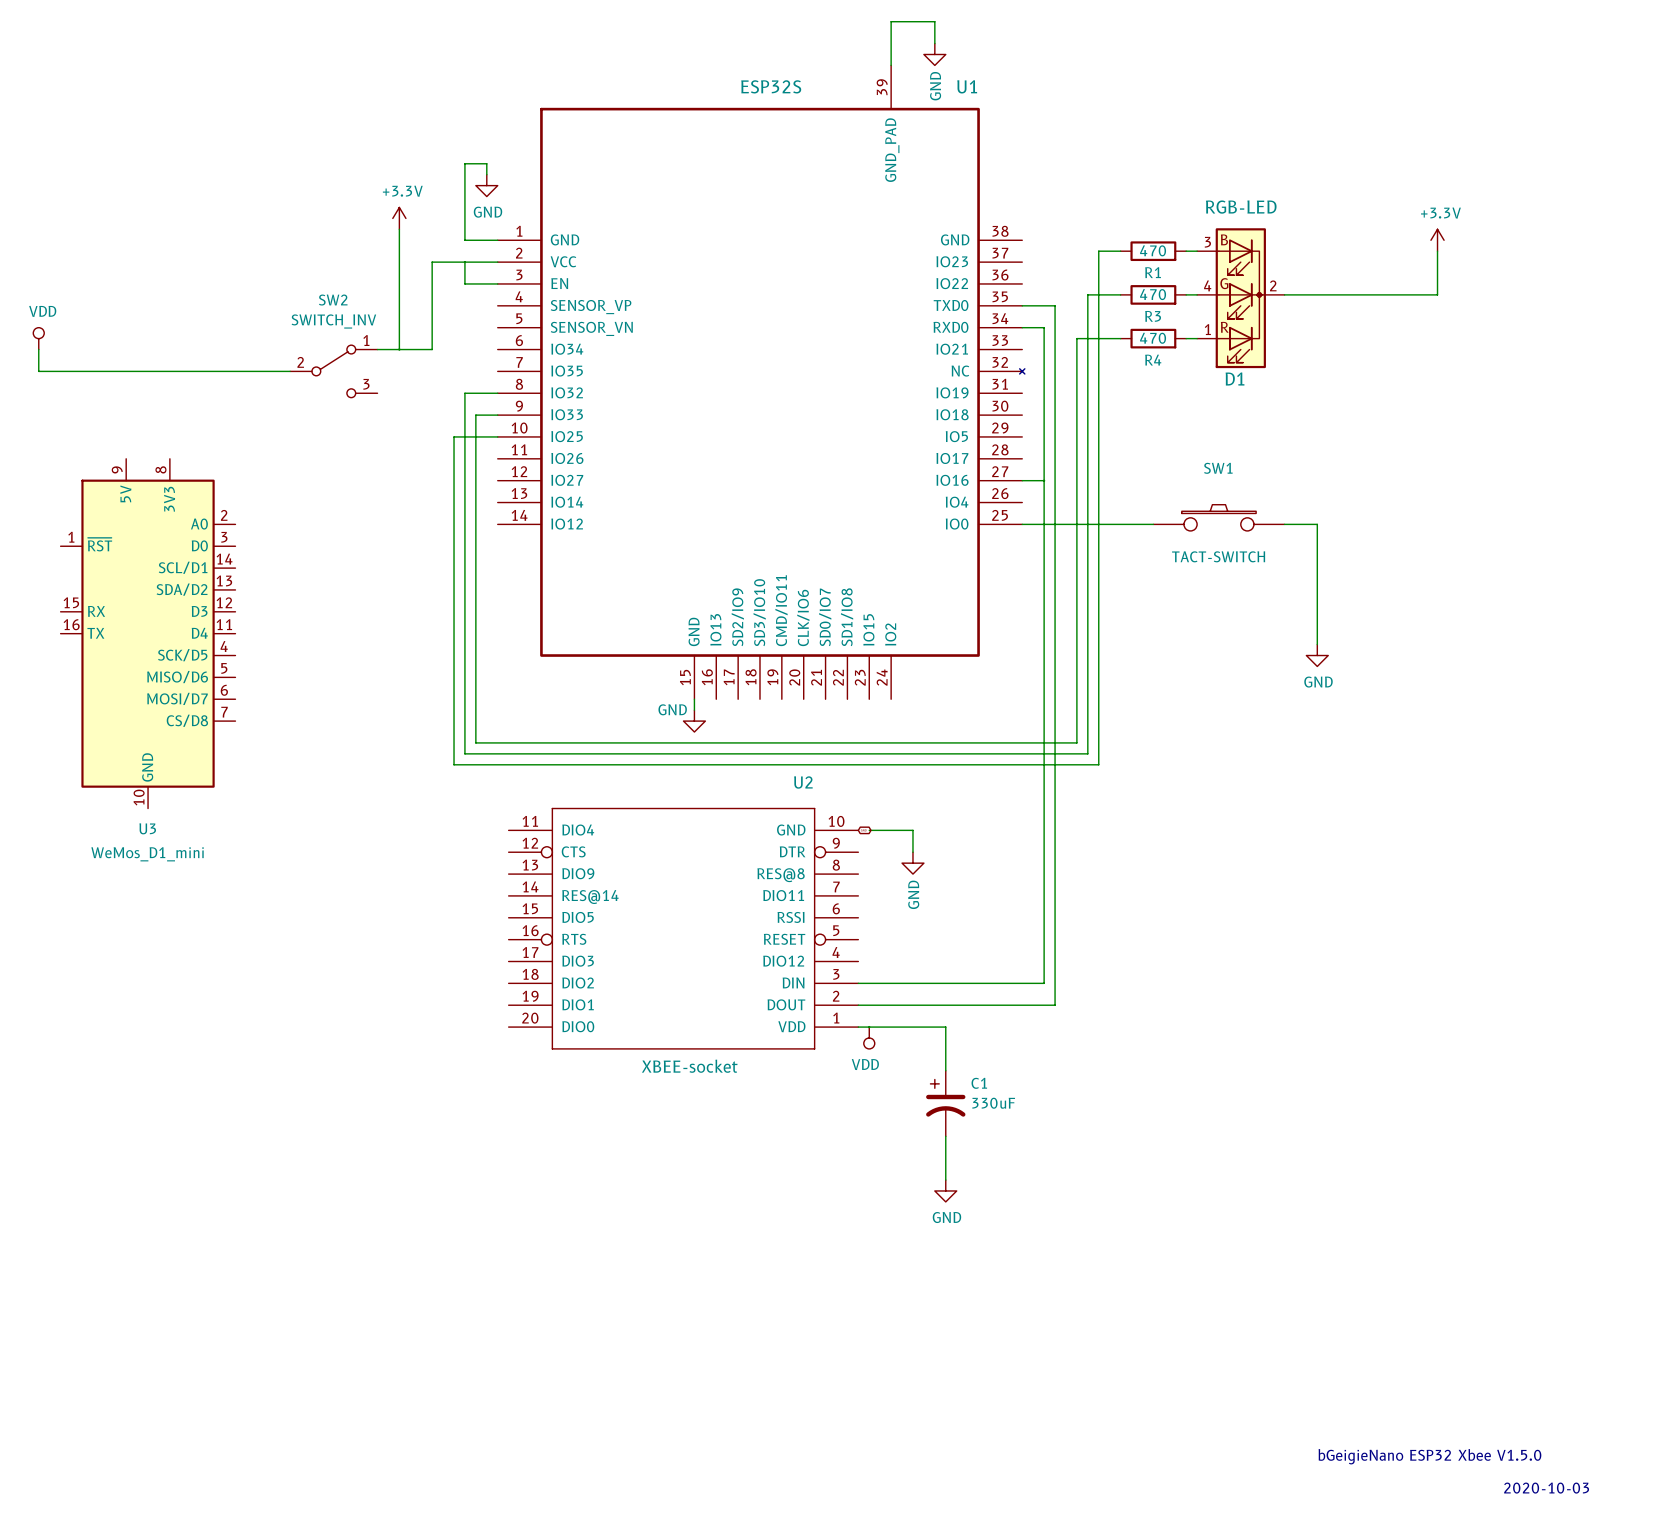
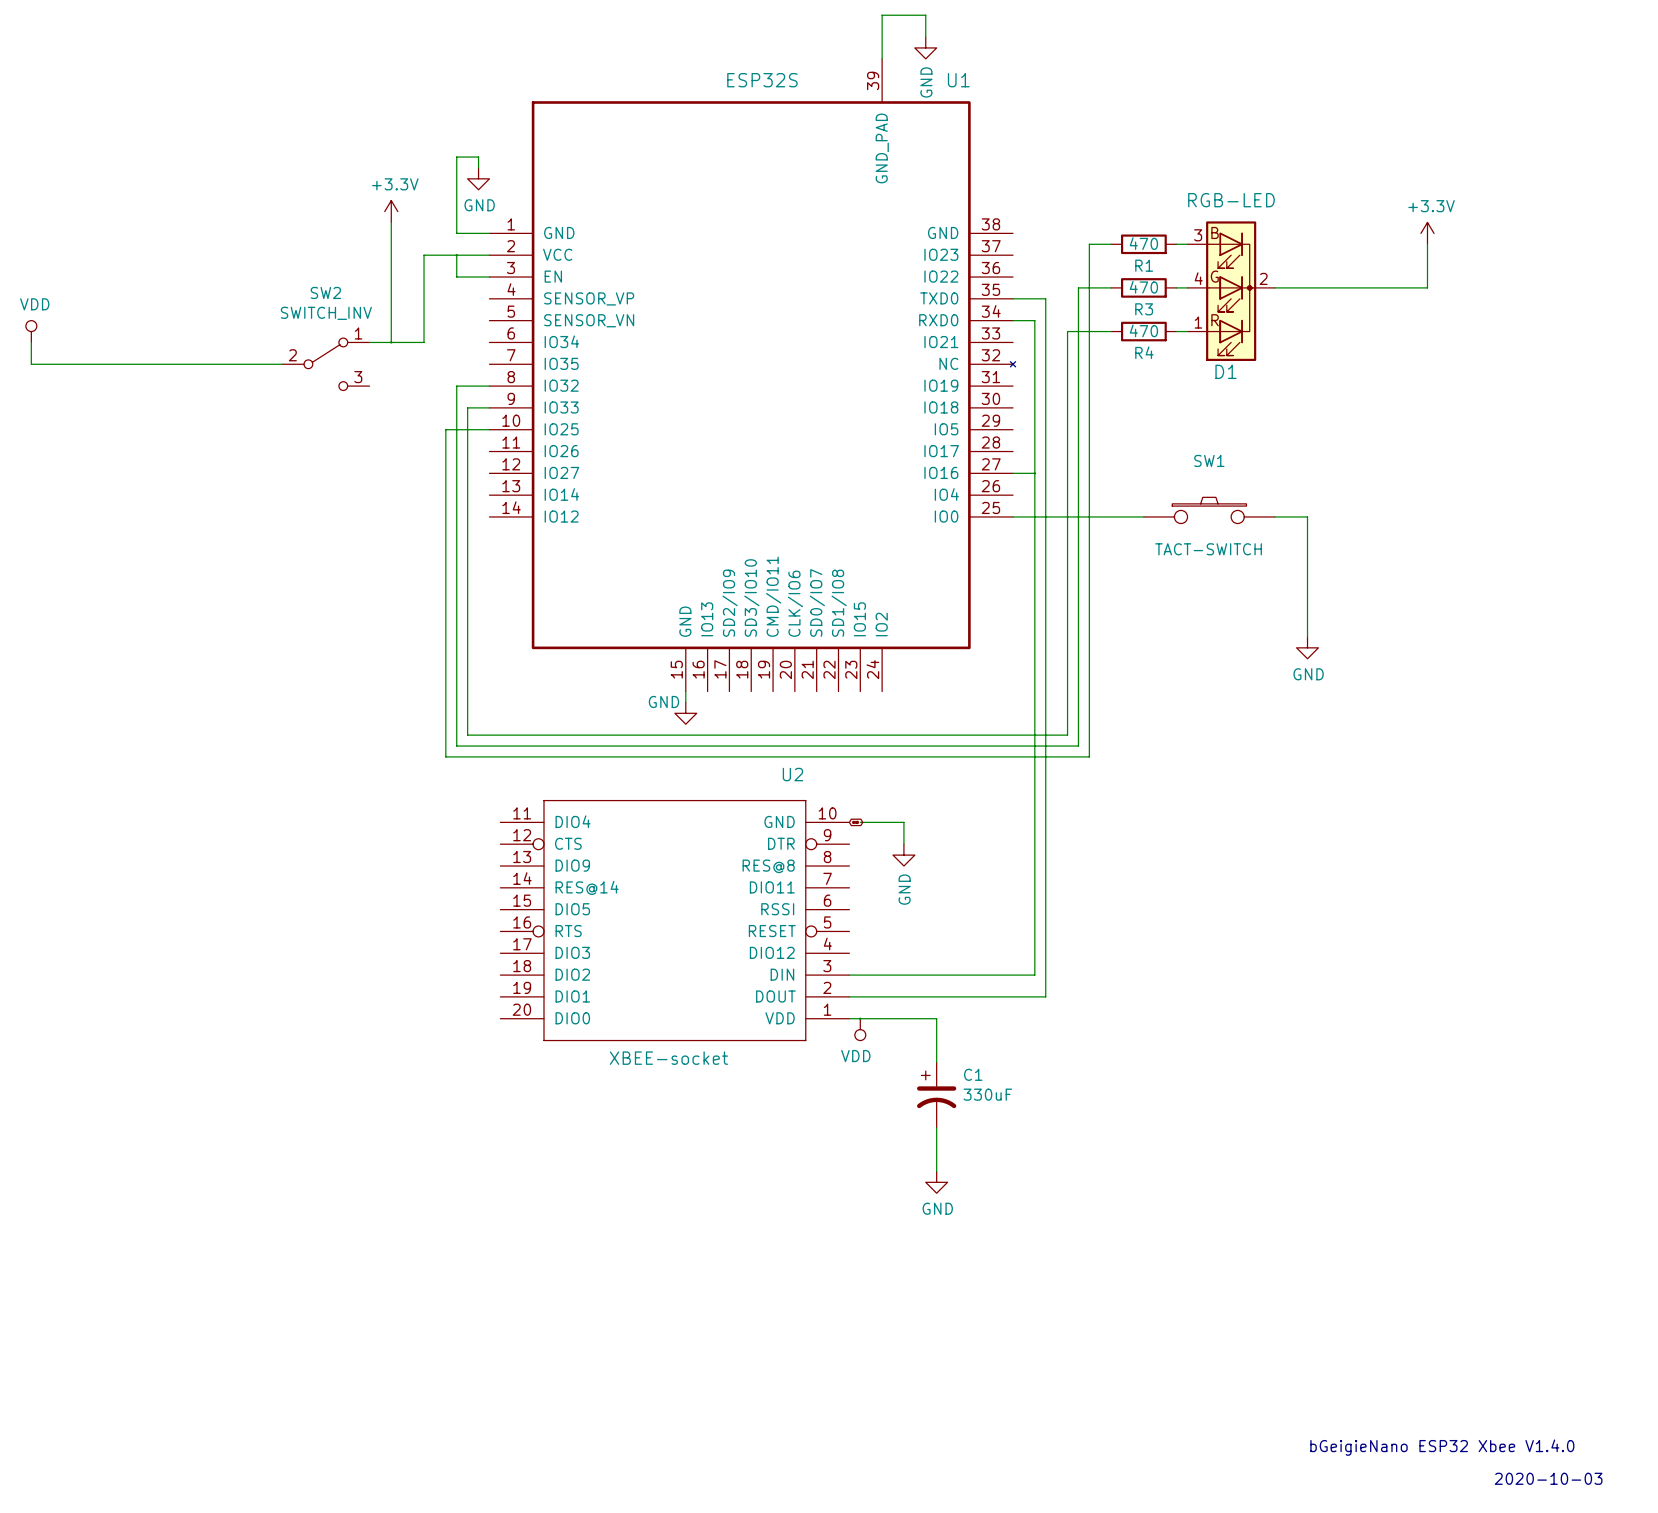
U3: WeMos_D1_mini (148, 633) -> none
text: bGeigieNano ESP32 Xbee V1.5.0 (1429, 1456) -> bGeigieNano ESP32 Xbee V1.4.0 (1442, 1447)

